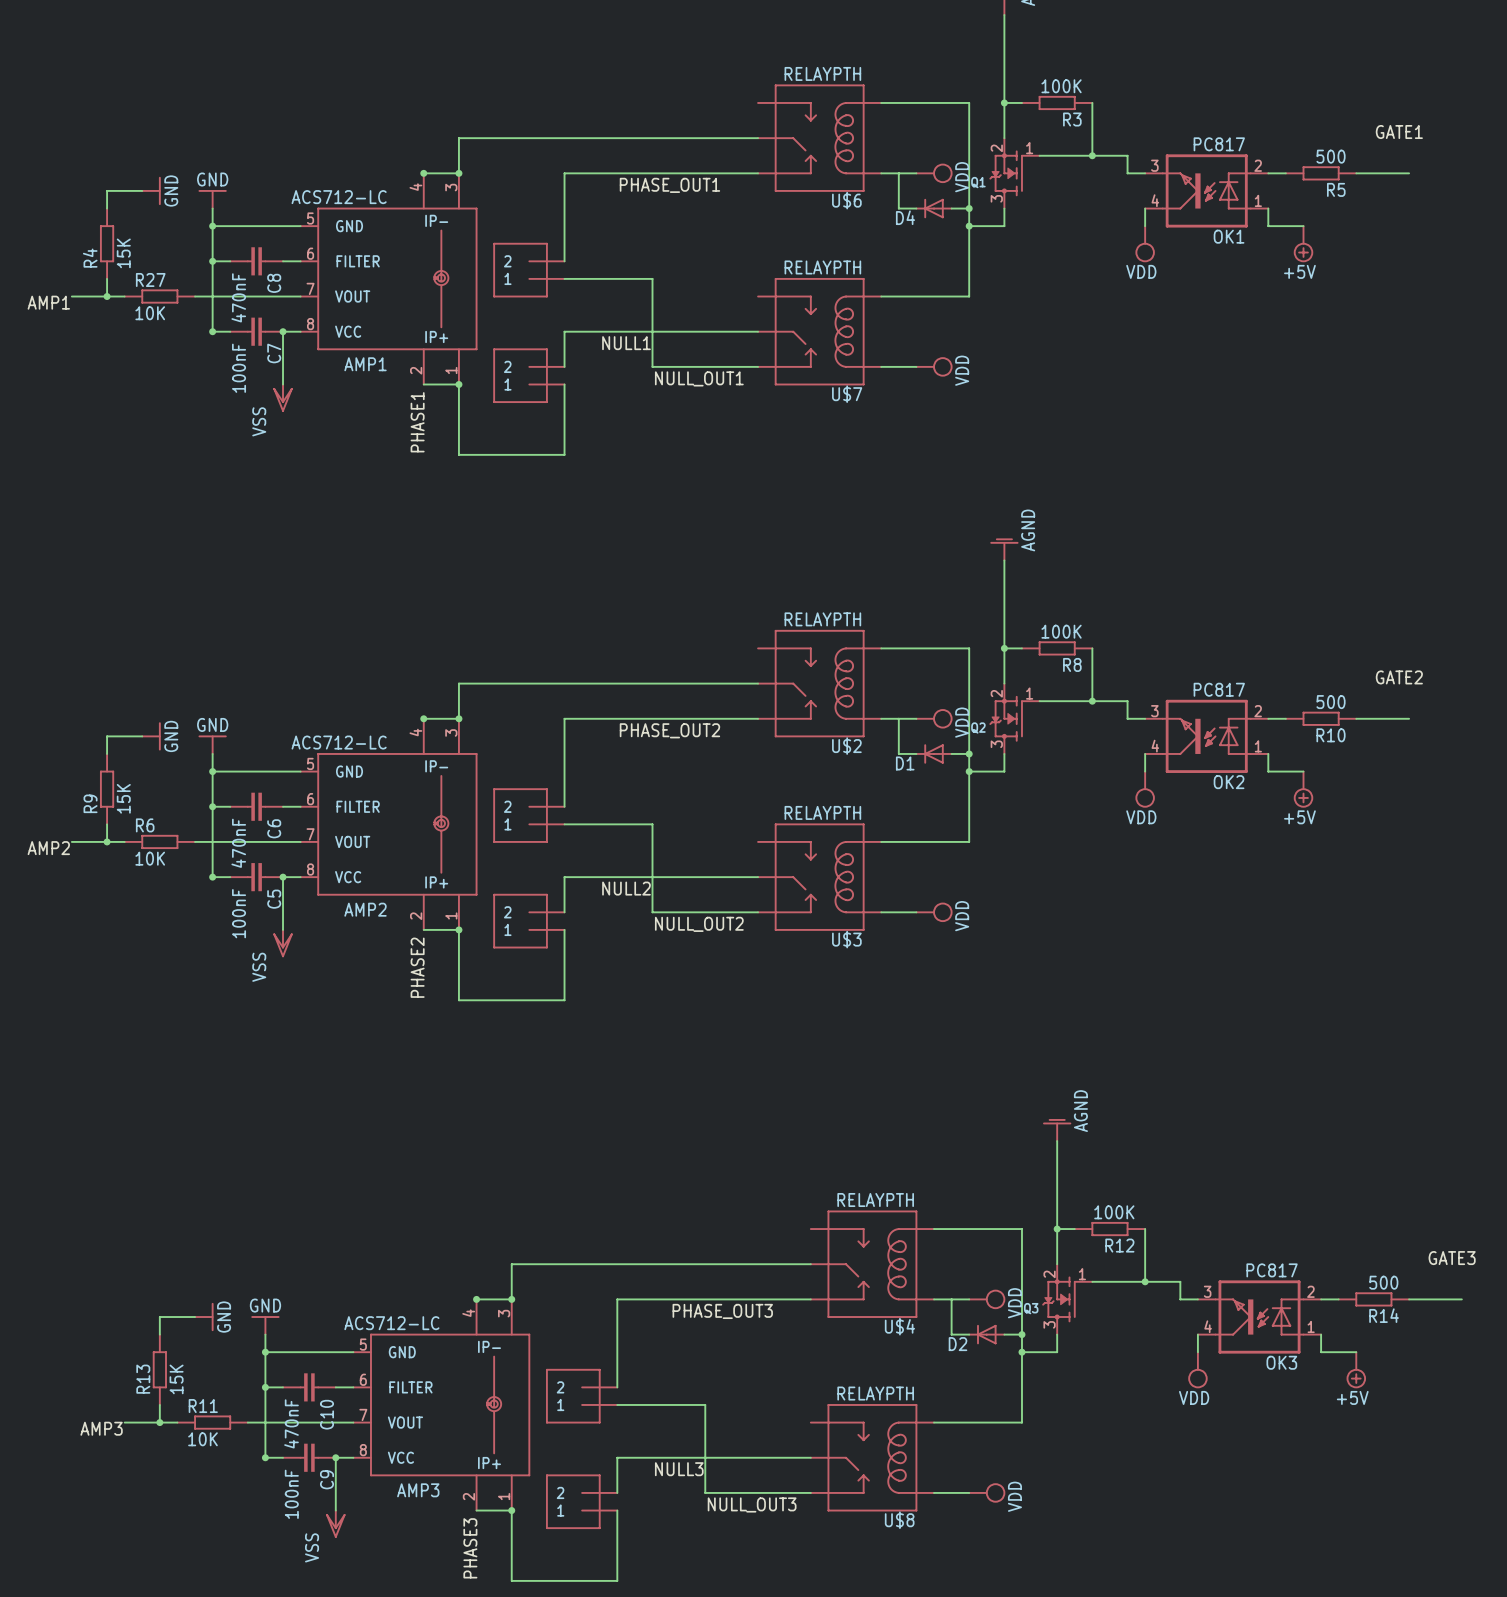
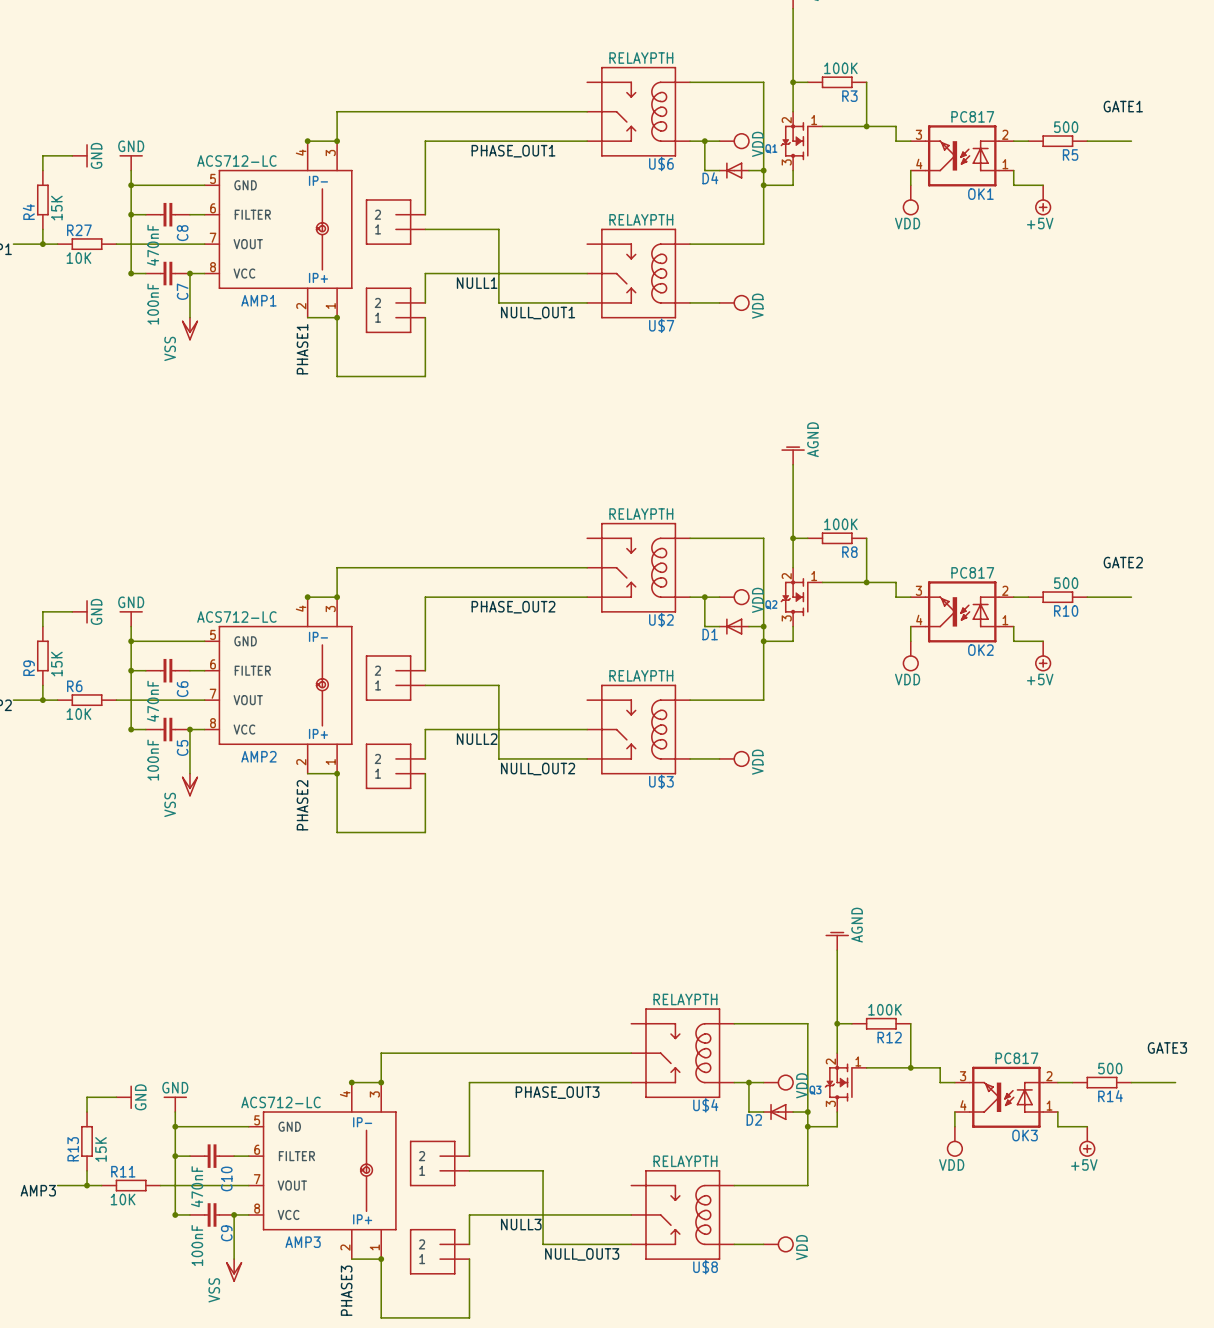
junction: none -> (704, 141)
junction: none -> (704, 597)
junction: none -> (748, 1082)

